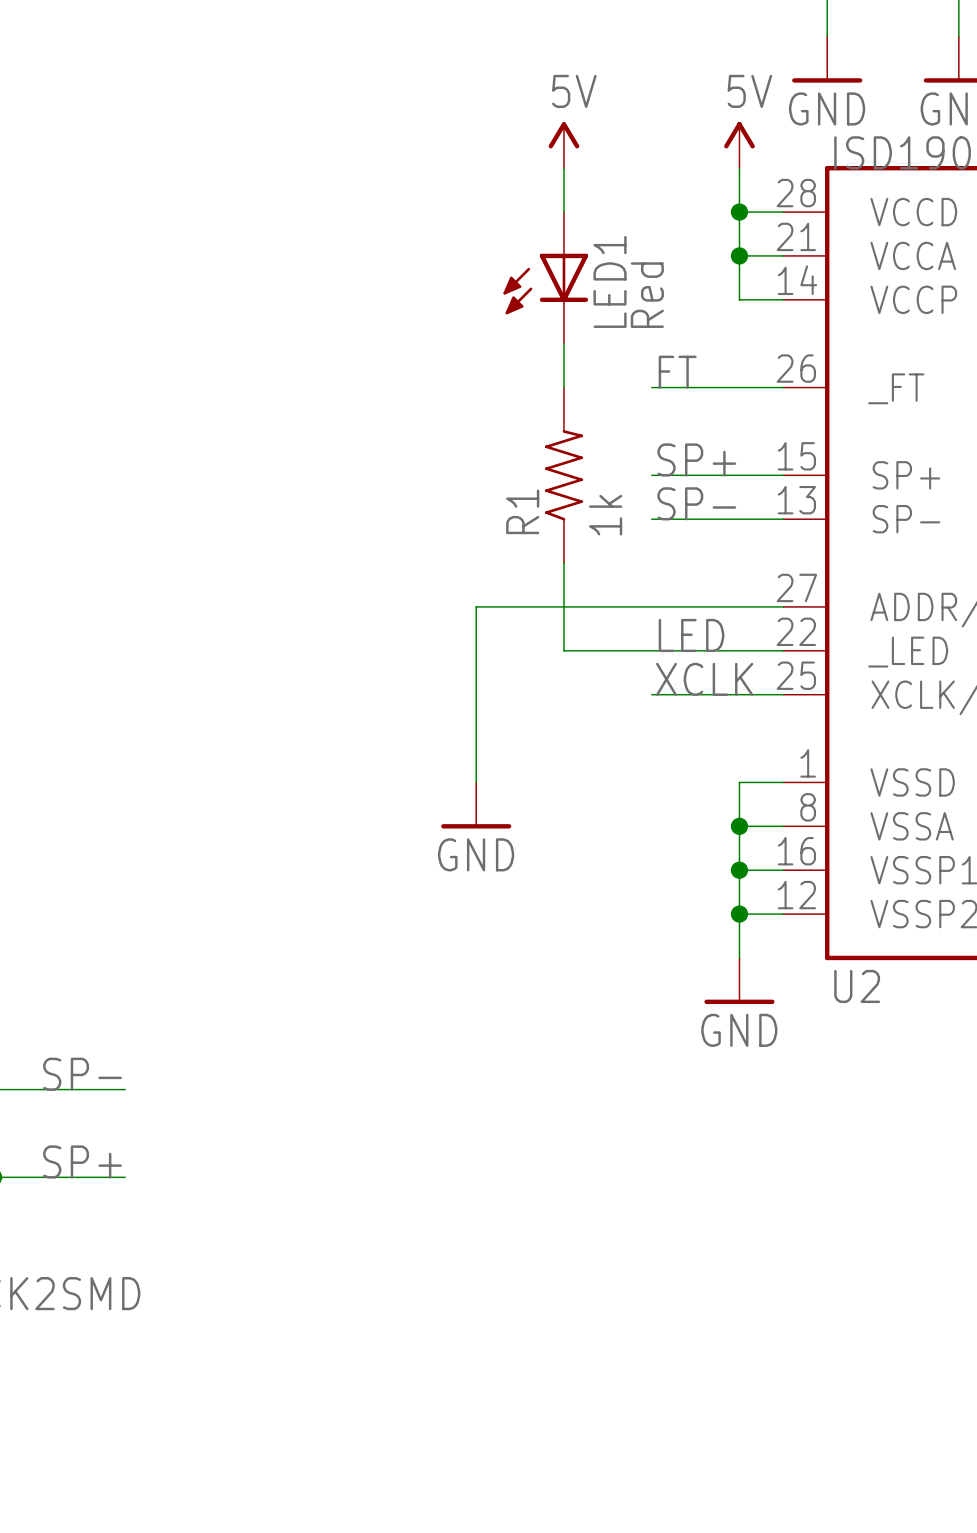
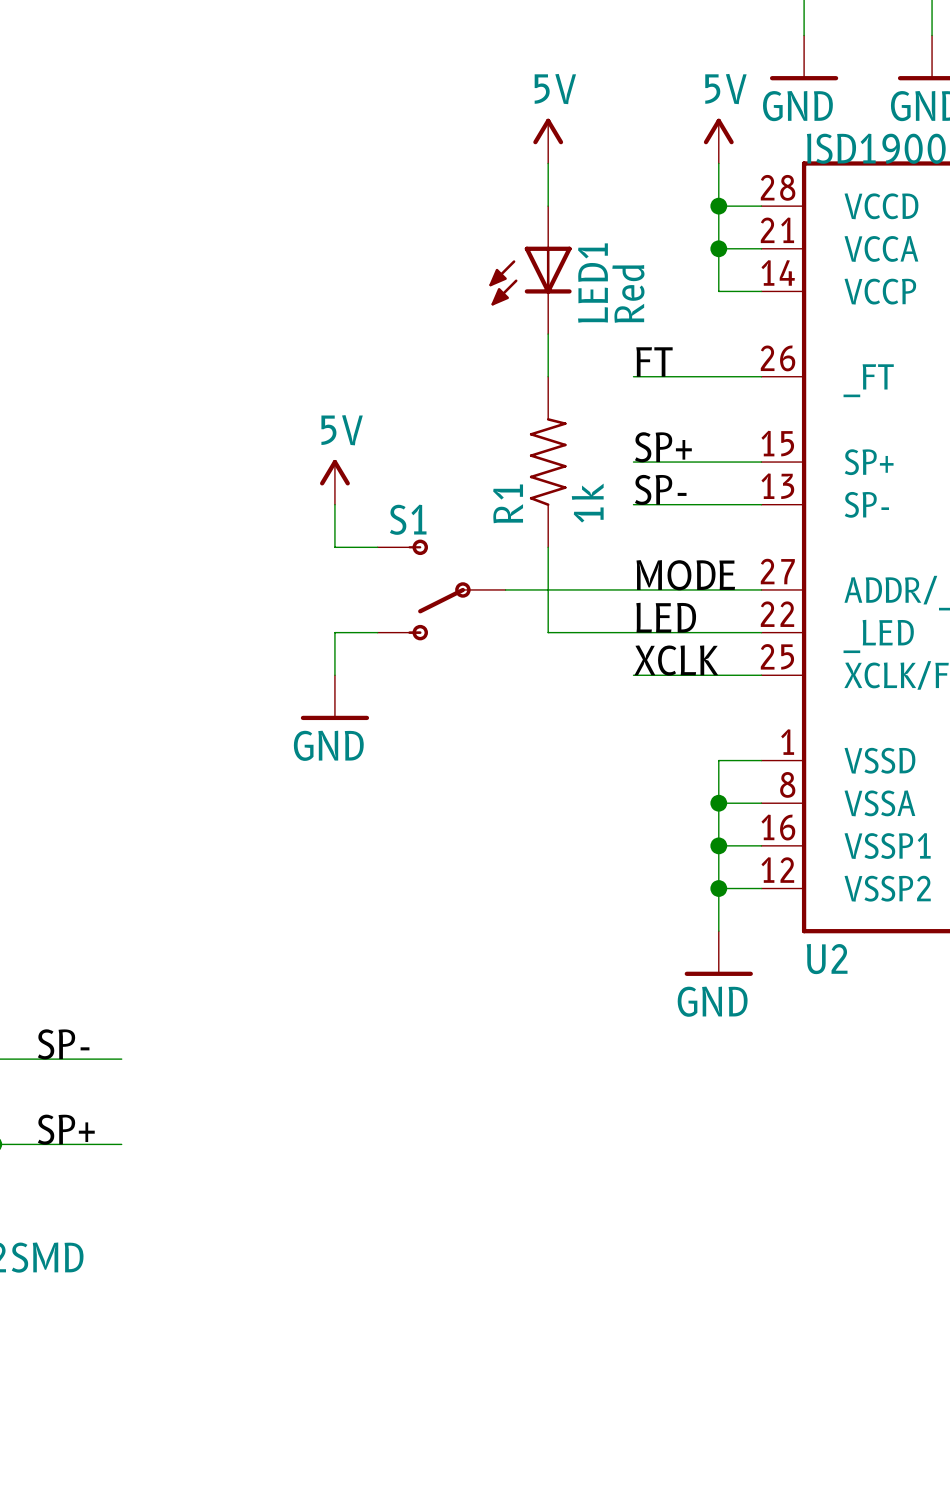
power symbol: none -> 5V (334, 482)
wire: none -> (334, 504) (334, 547) (377, 547)
label: none -> MODE (685, 575)
S1: none -> (441, 589)
wire: (520, 606) (476, 606) (476, 782) -> none
wire: none -> (377, 632) (334, 632) (334, 675)
power symbol position: GND (476, 805) -> GND (334, 697)

